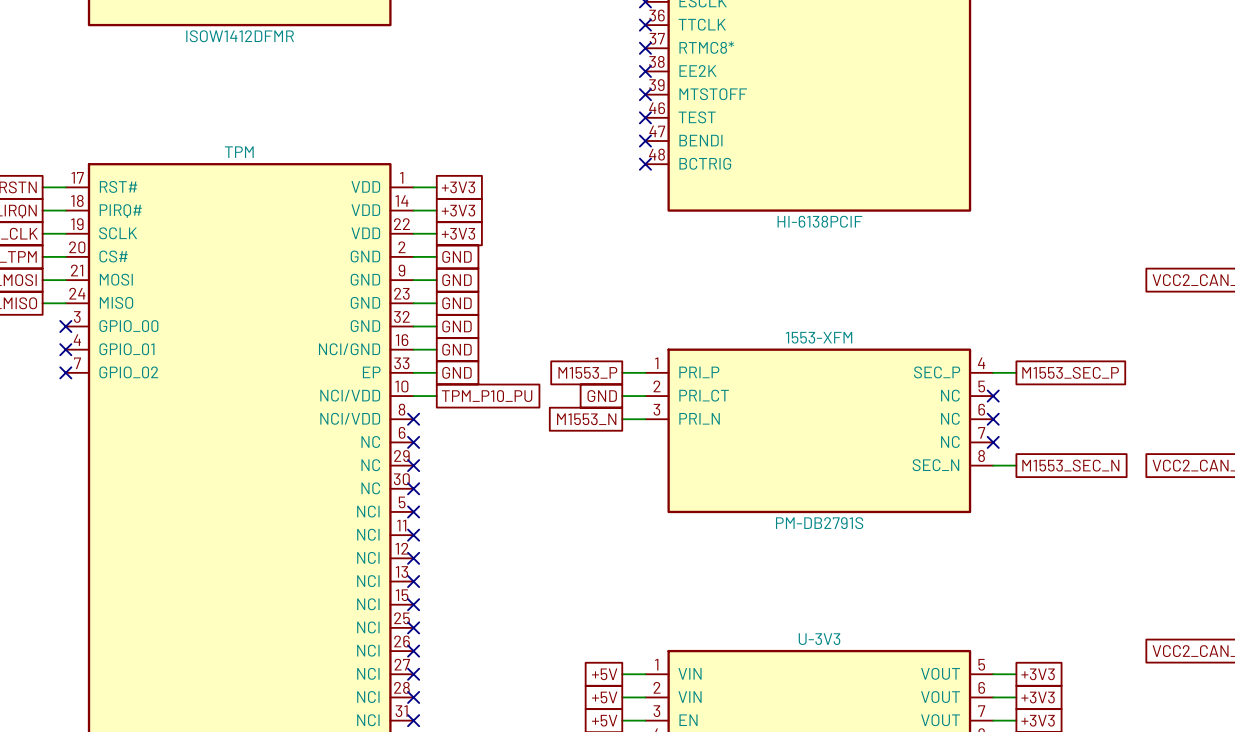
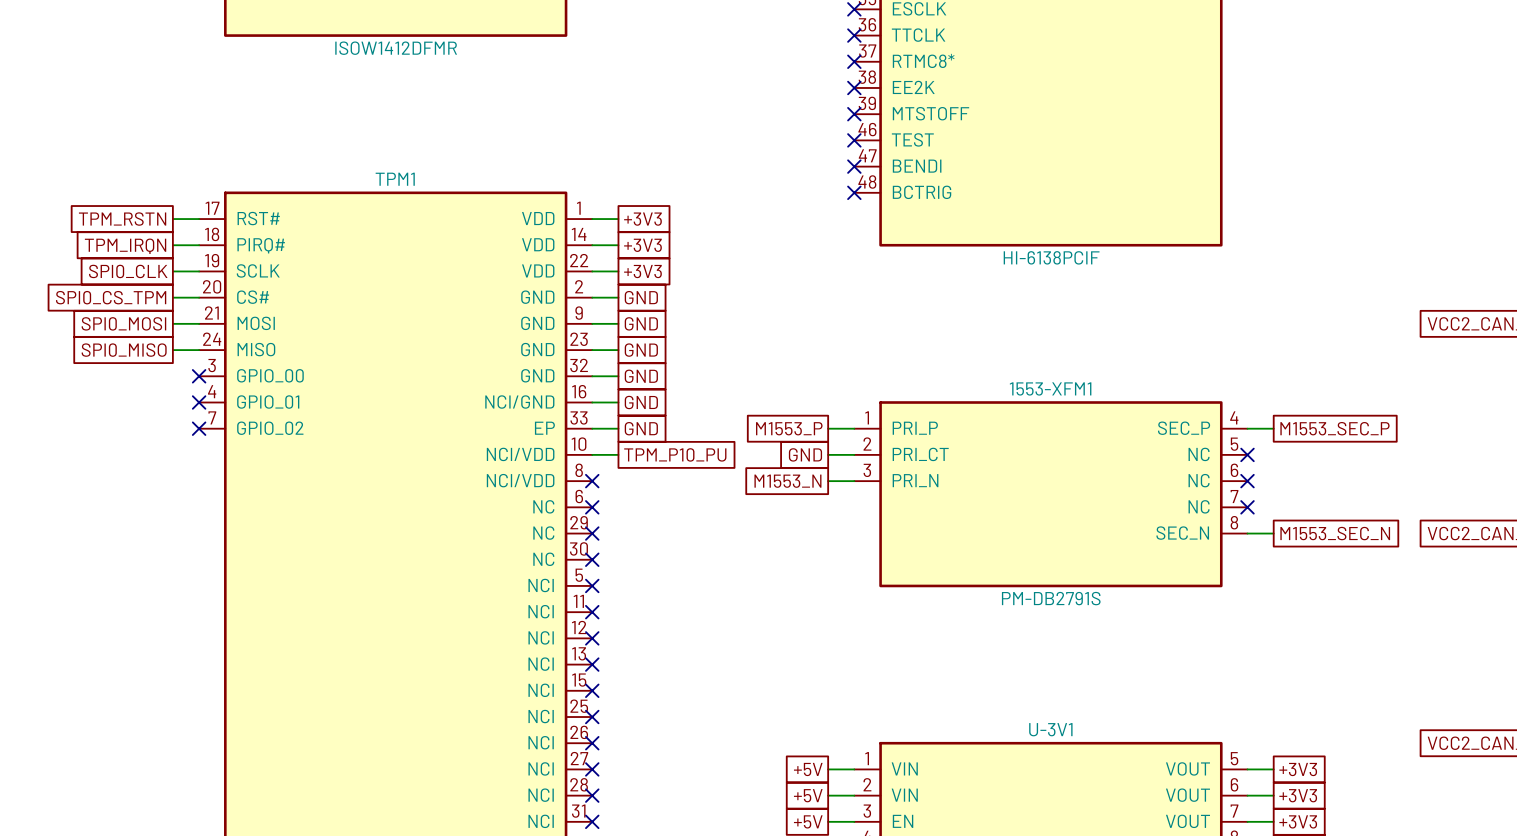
TPM name: TPM (239, 152) -> TPM1 (395, 179)
1553-XFM name: 1553-XFM (819, 337) -> 1553-XFM1 (1050, 388)
U-3V3 name: U-3V3 (819, 639) -> U-3V1 (1050, 729)

